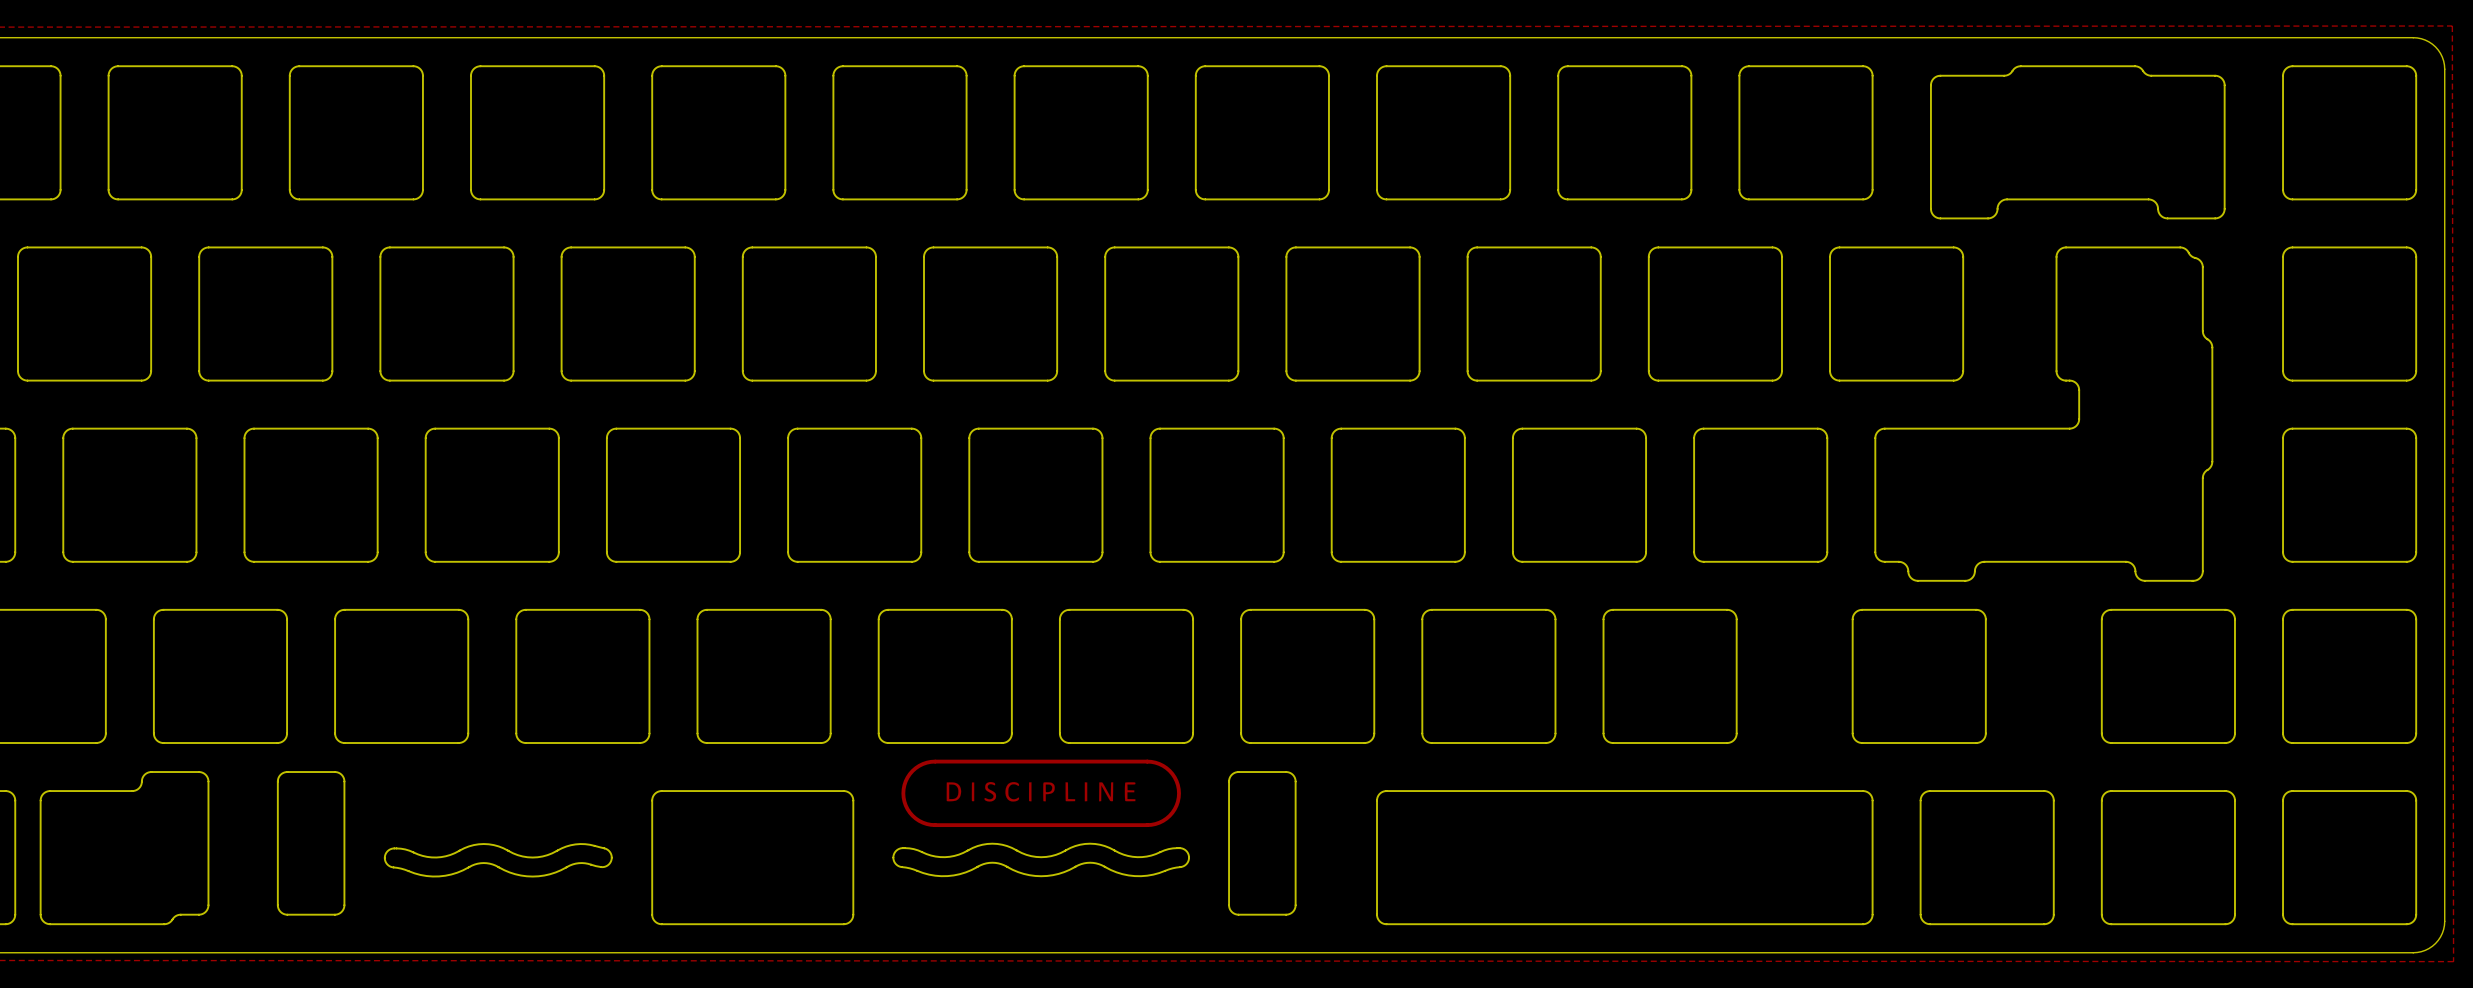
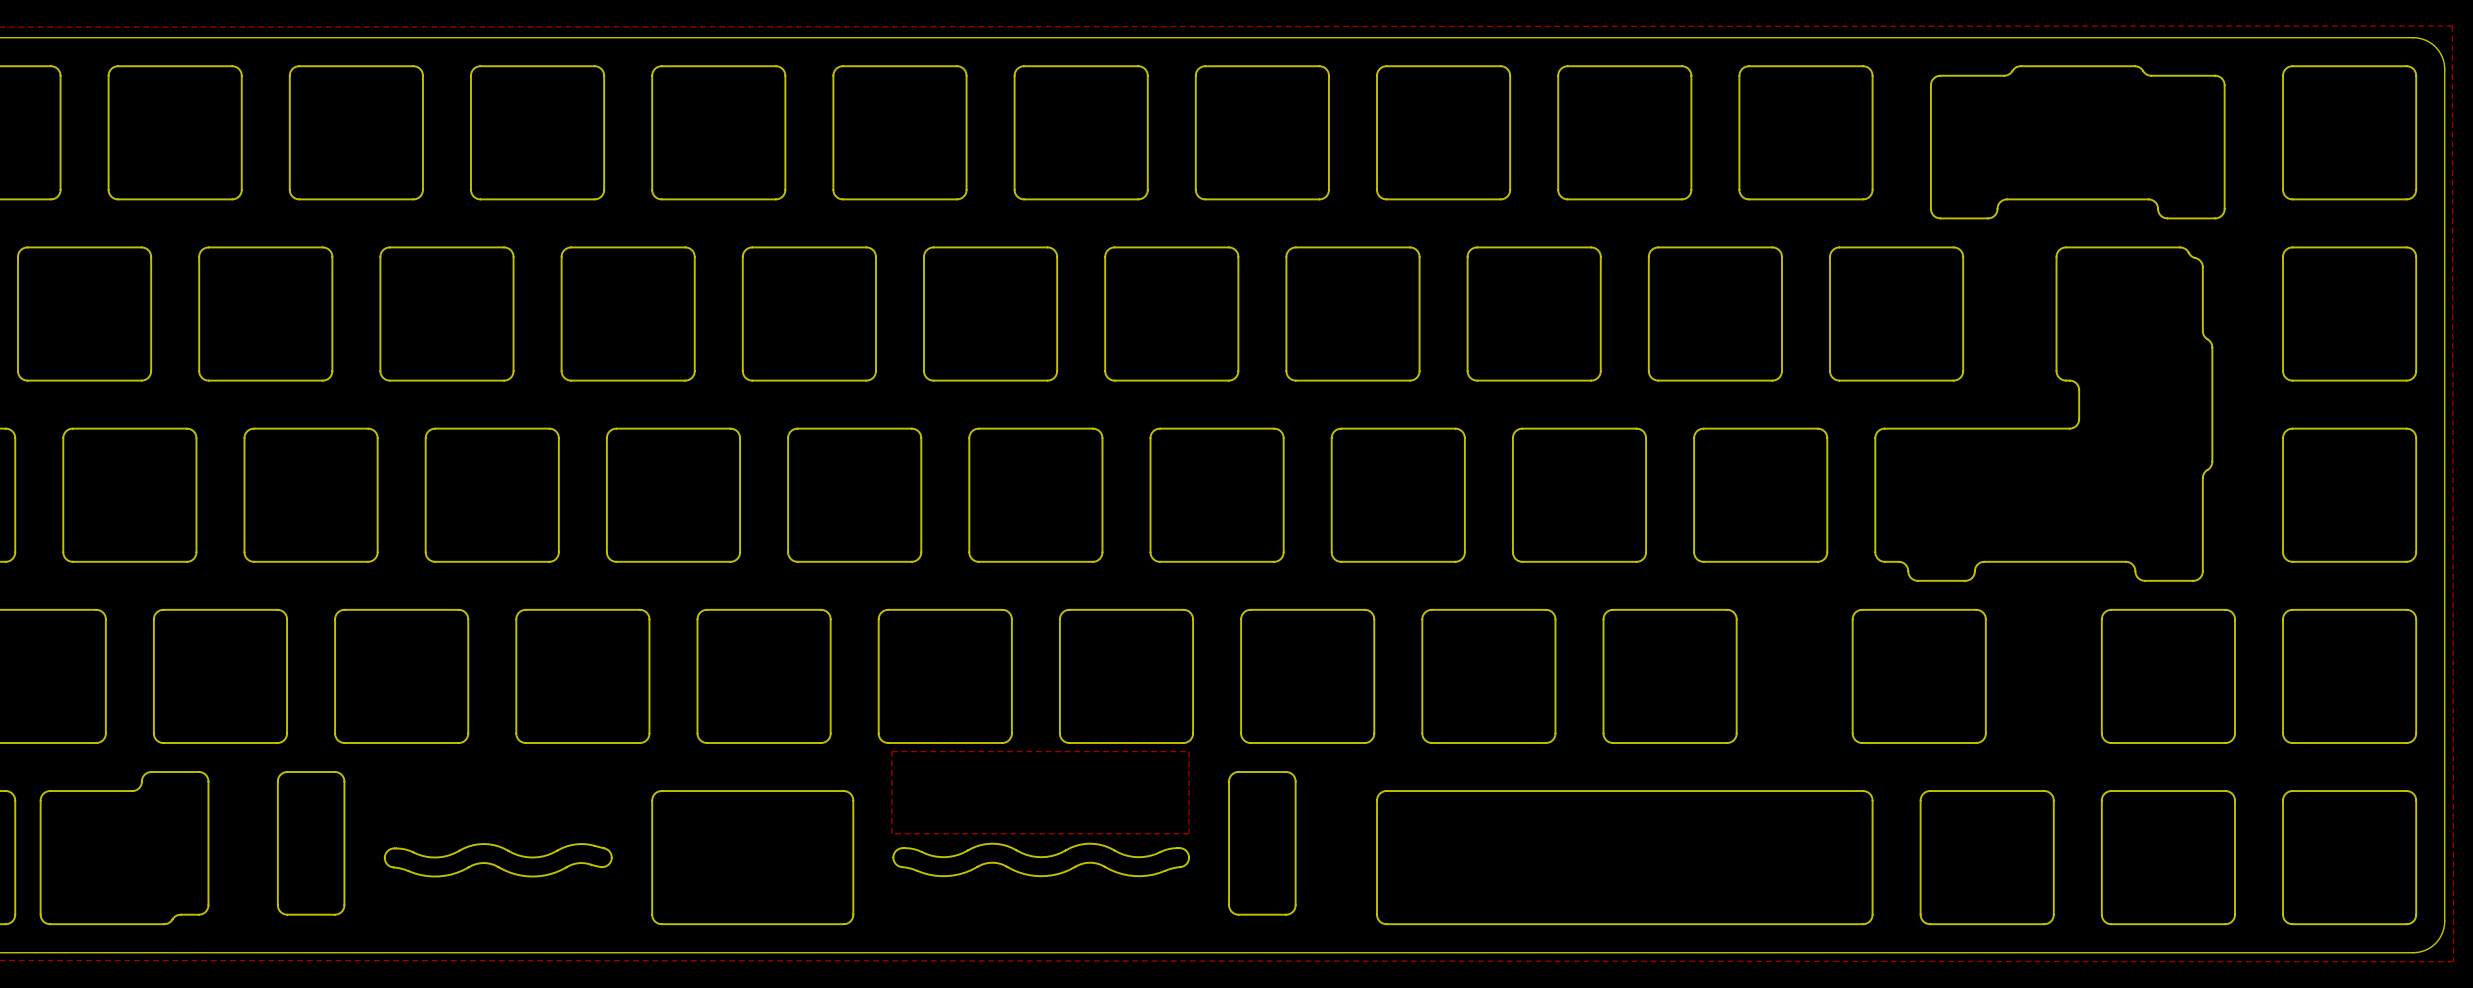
zone outline: none -> (891, 751) (1189, 751) (1189, 833) (891, 833) (891, 751)
drawing: [901, 759, 1181, 828] -> none

